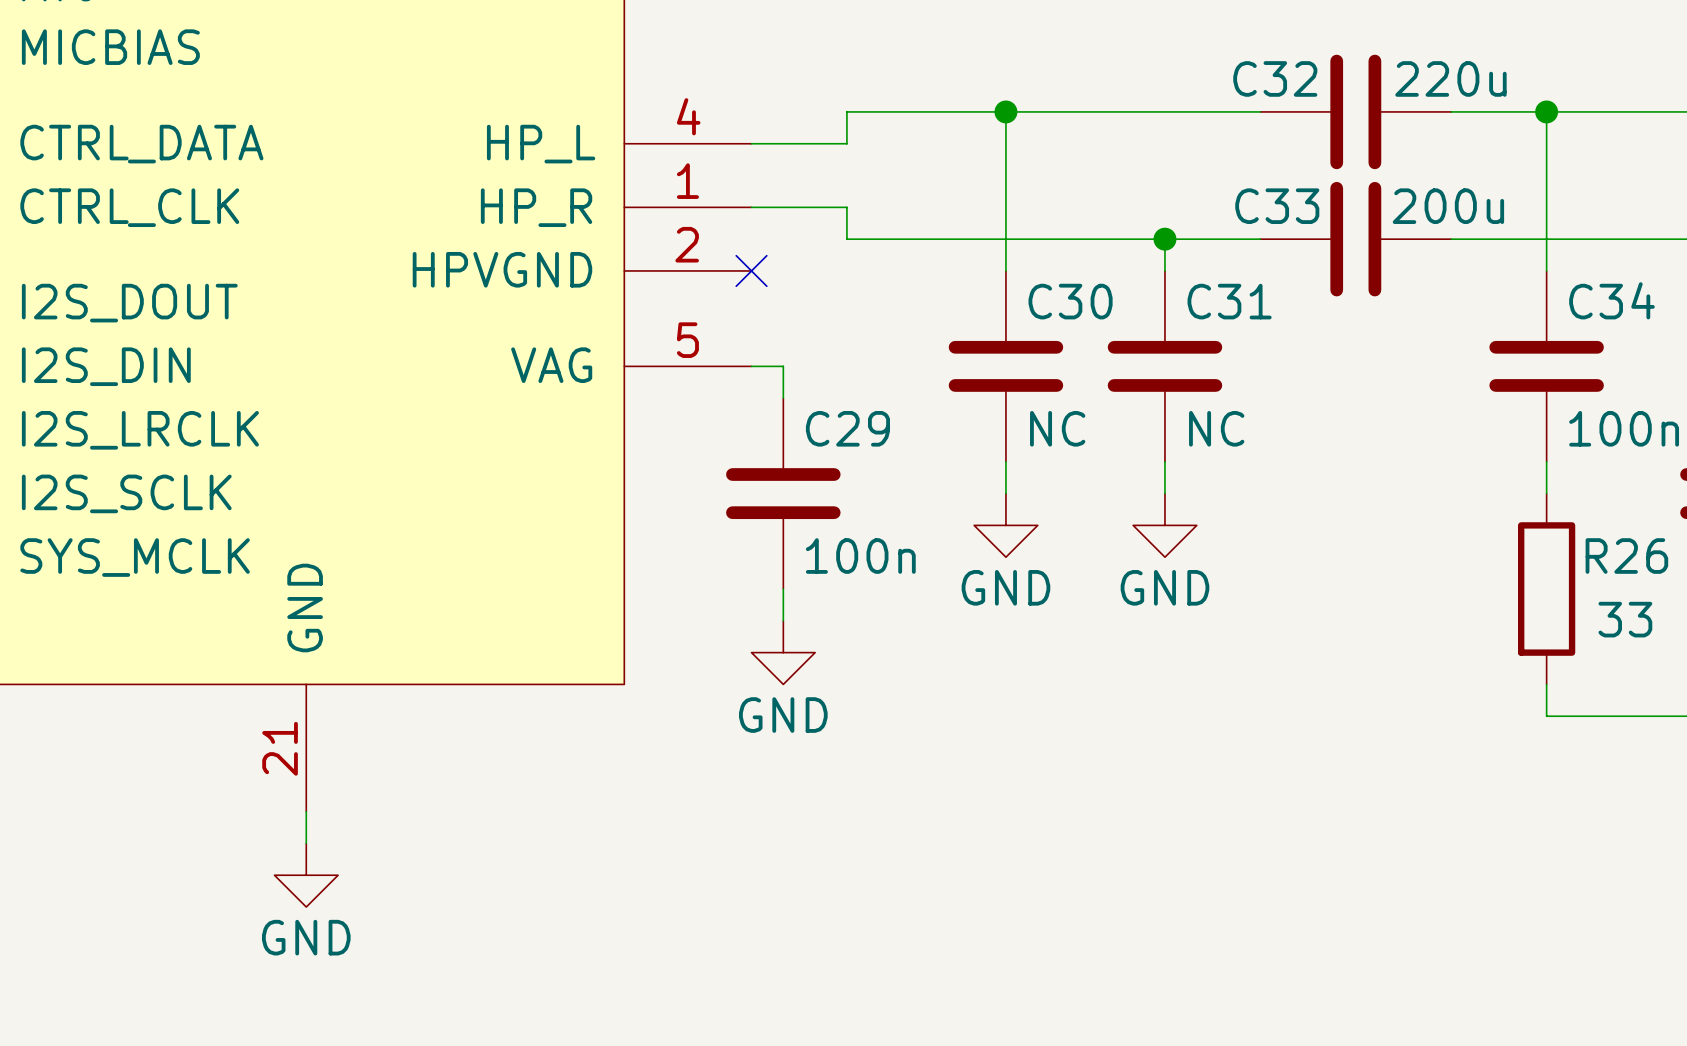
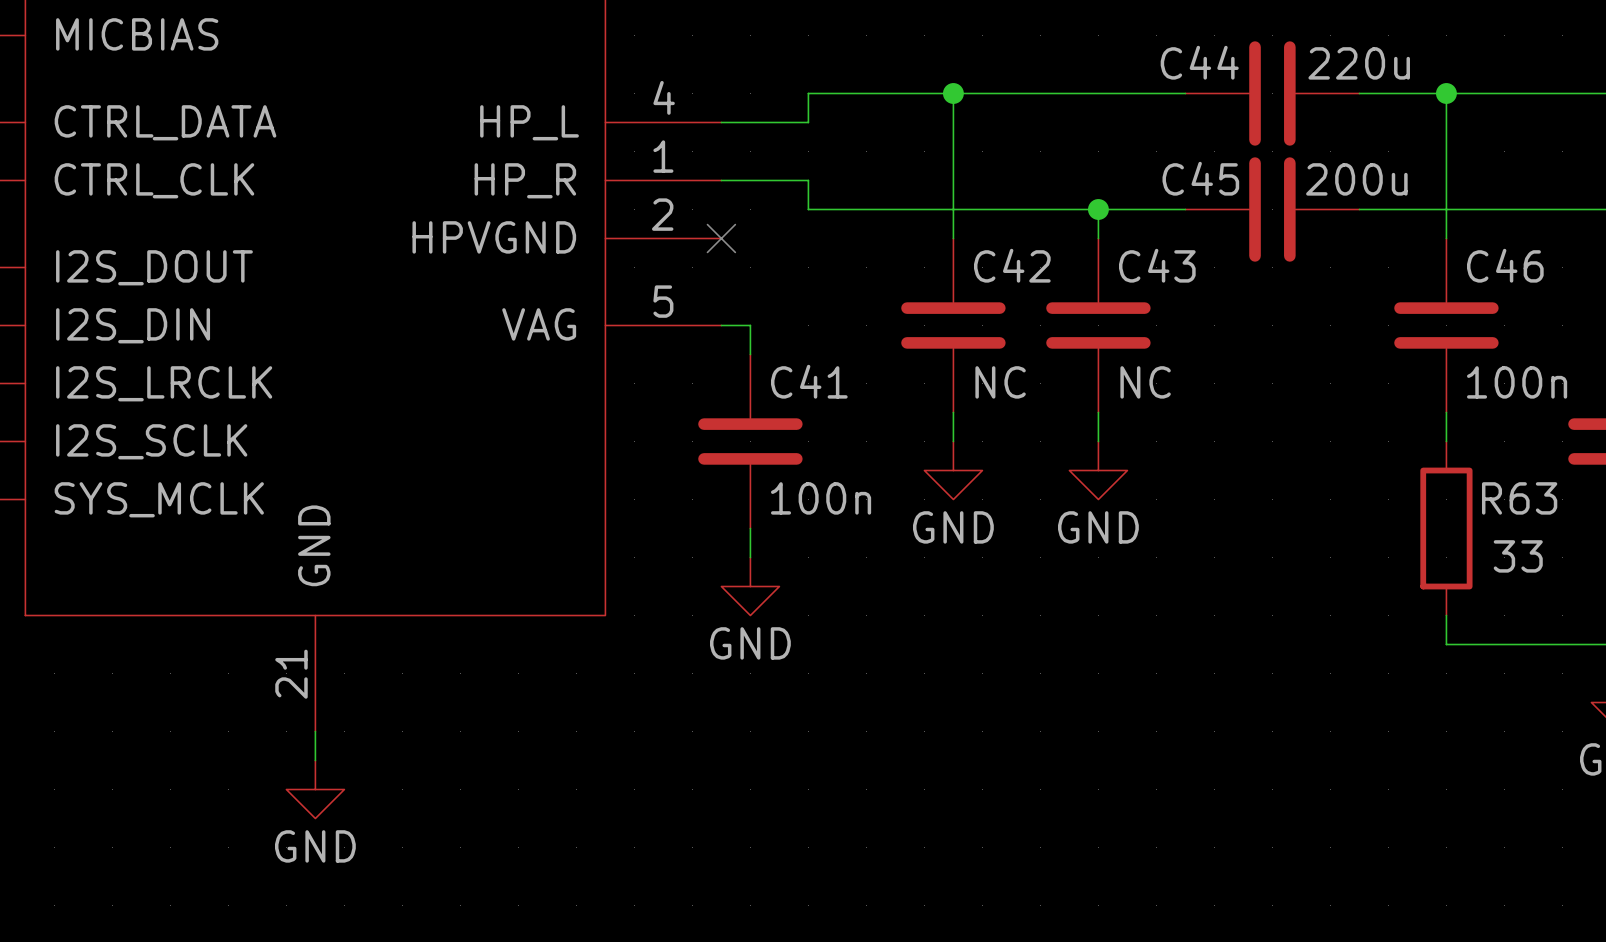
C32 name: C32 (1275, 78) -> C44 (1199, 62)
C33 name: C33 (1277, 206) -> C45 (1200, 178)
C34 name: C34 (1611, 300) -> C46 (1505, 265)
C30 name: C30 (1070, 301) -> C42 (1012, 265)
C31 name: C31 (1229, 301) -> C43 (1157, 265)
C29 name: C29 (847, 428) -> C41 (809, 381)
R26 name: R26 (1626, 556) -> R63 (1519, 498)

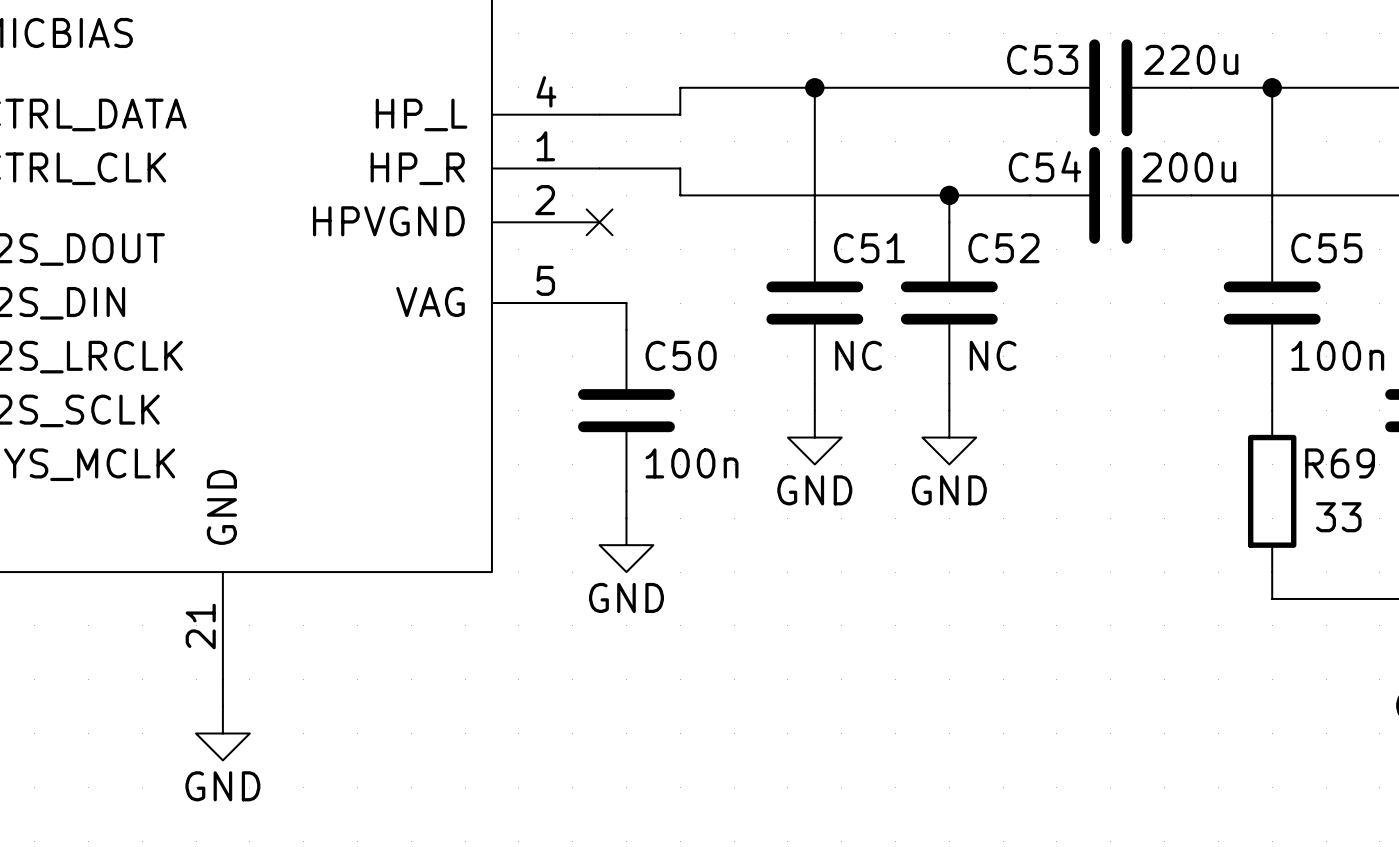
C44 name: C44 (1199, 62) -> C53 (1042, 59)
C45 name: C45 (1200, 178) -> C54 (1044, 166)
C42 name: C42 (1012, 265) -> C51 (869, 248)
C43 name: C43 (1157, 265) -> C52 (1003, 248)
C46 name: C46 (1505, 265) -> C55 (1326, 248)
C41 name: C41 (809, 381) -> C50 (681, 355)
R63 name: R63 (1519, 498) -> R69 (1340, 463)

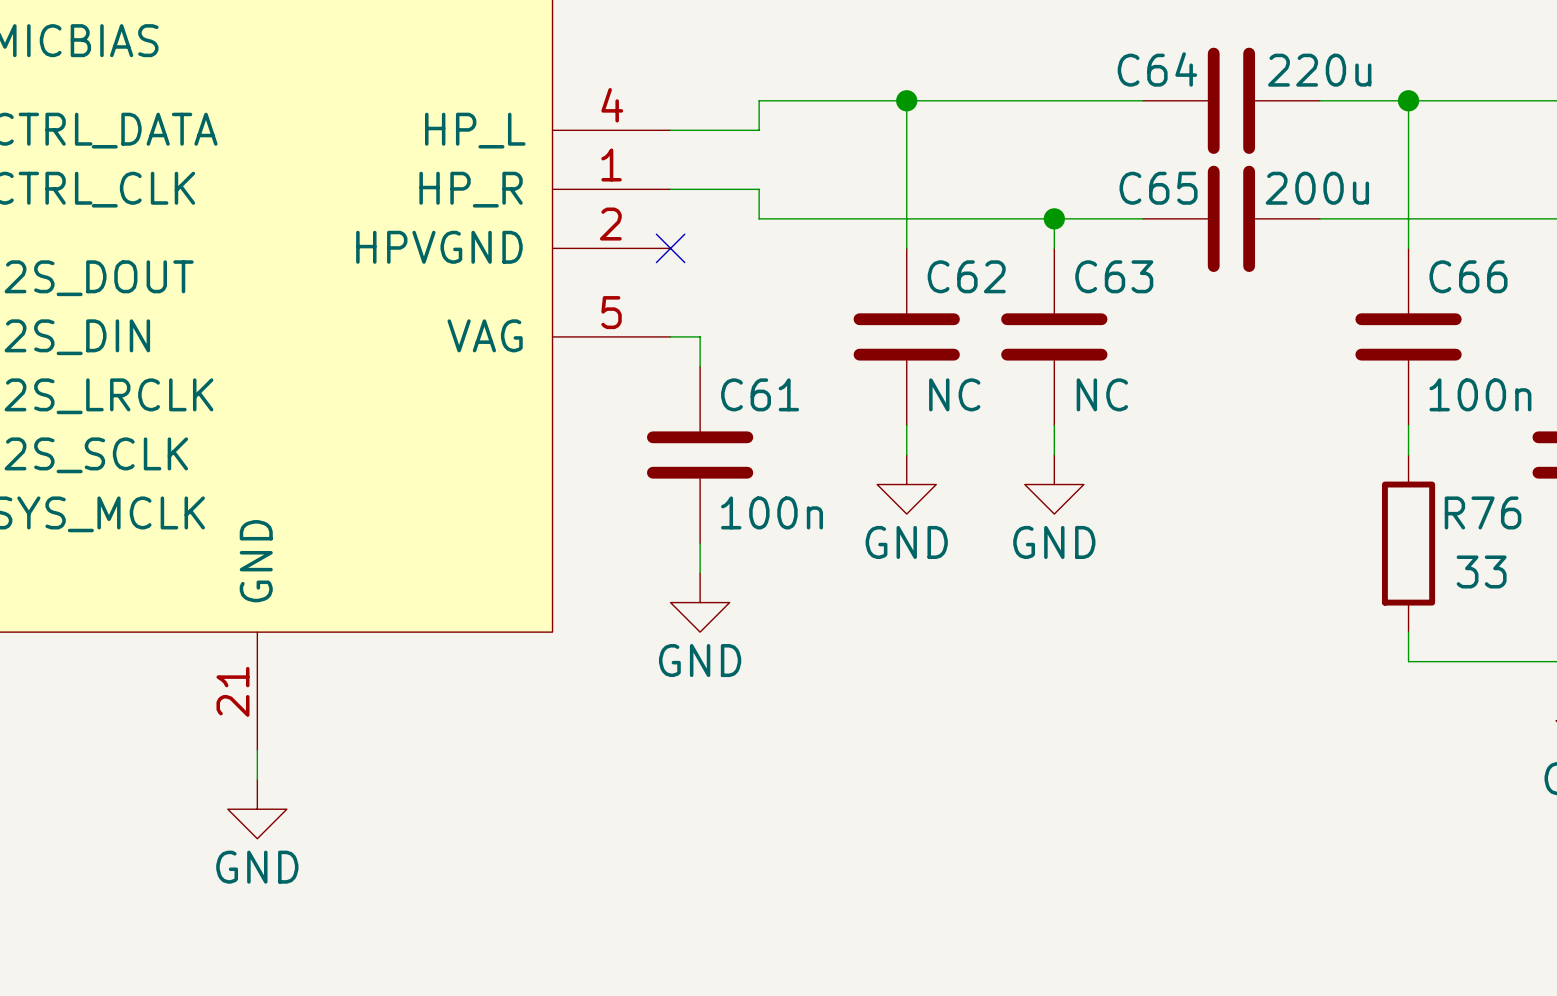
C53 name: C53 (1042, 59) -> C64 (1157, 69)
C54 name: C54 (1044, 166) -> C65 (1158, 188)
C51 name: C51 (869, 248) -> C62 (966, 276)
C52 name: C52 (1003, 248) -> C63 (1114, 276)
C55 name: C55 (1326, 248) -> C66 (1468, 276)
C50 name: C50 (681, 355) -> C61 (760, 394)
R69 name: R69 (1340, 463) -> R76 (1483, 512)

